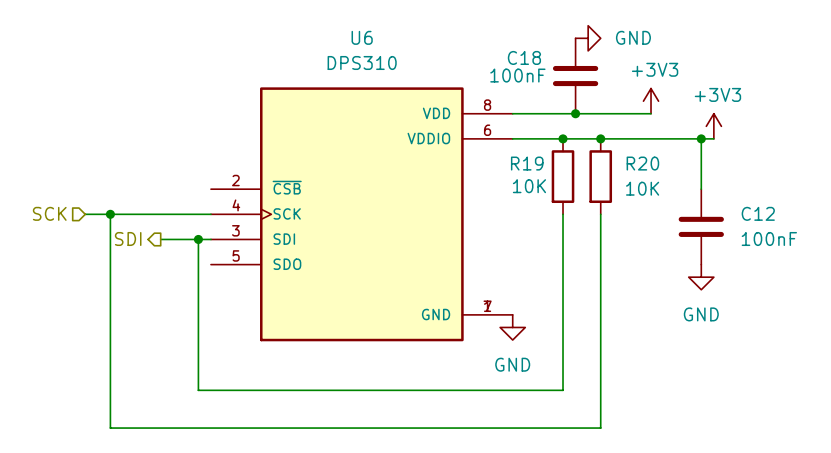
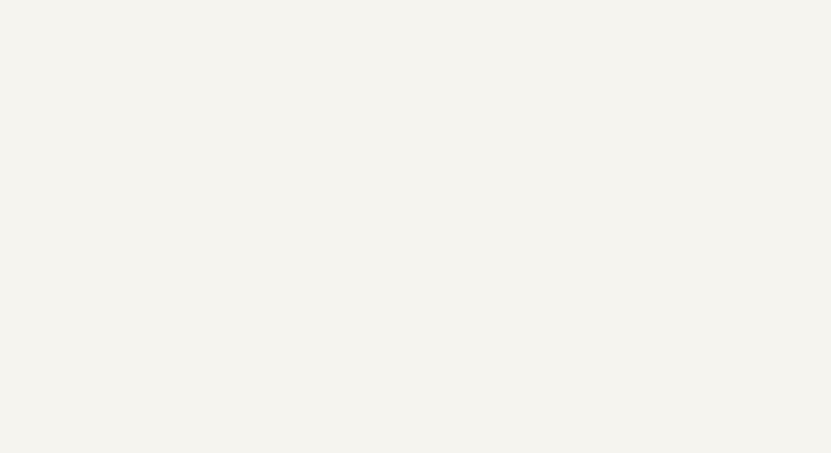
power symbol: GND (588, 38) -> none
C18: 100nF (575, 76) -> none
power symbol: +3V3 (651, 101) -> none
wire: (512, 113) (651, 113) -> none
junction: (575, 113) -> none
power symbol: +3V3 (713, 126) -> none
wire: (512, 138) (713, 138) -> none
junction: (563, 138) -> none
junction: (600, 138) -> none
wire: (701, 138) (701, 189) -> none
junction: (701, 138) -> none
R19: 10K (563, 176) -> none
R20: 10K (600, 176) -> none
hierarchical label: SCK (49, 213) -> none
wire: (85, 214) (210, 214) -> none
wire: (110, 214) (110, 428) (600, 428) (600, 214) -> none
junction: (110, 214) -> none
U6: DPS310 (361, 214) -> none
wire: (563, 214) (563, 390) (198, 390) (198, 239) -> none
C12: 100nF (701, 226) -> none
hierarchical label: SDI (128, 238) -> none
wire: (160, 239) (210, 239) -> none
junction: (198, 239) -> none
power symbol: GND (701, 277) -> none
power symbol: GND (512, 327) -> none

